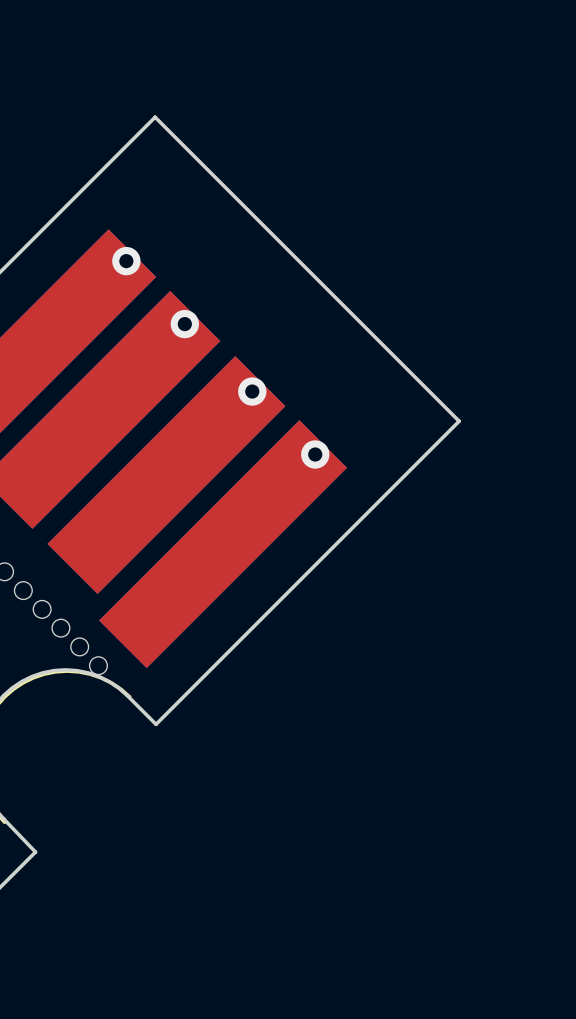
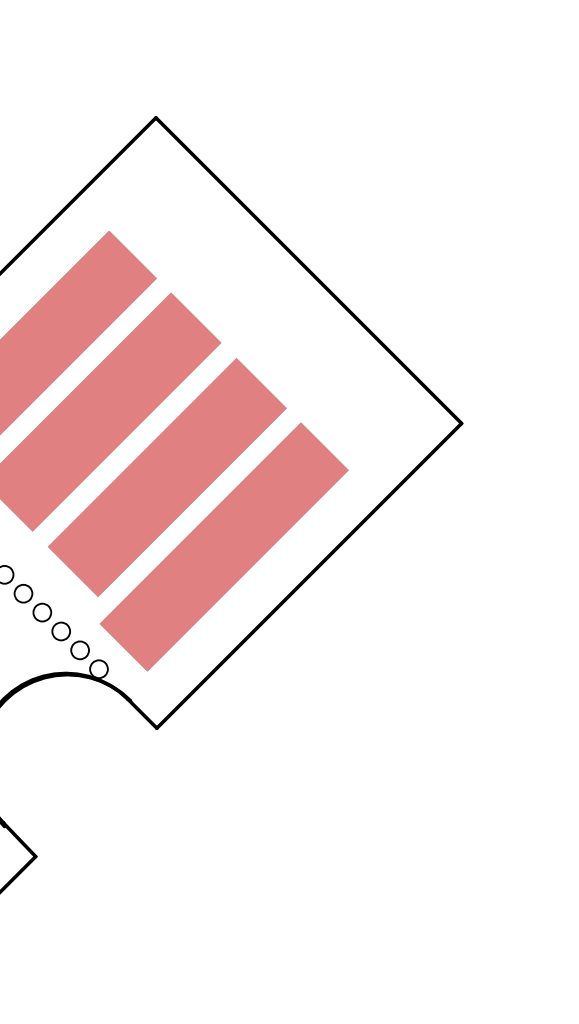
via: (126, 261) -> none
via: (184, 324) -> none
via: (252, 391) -> none
via: (315, 454) -> none

